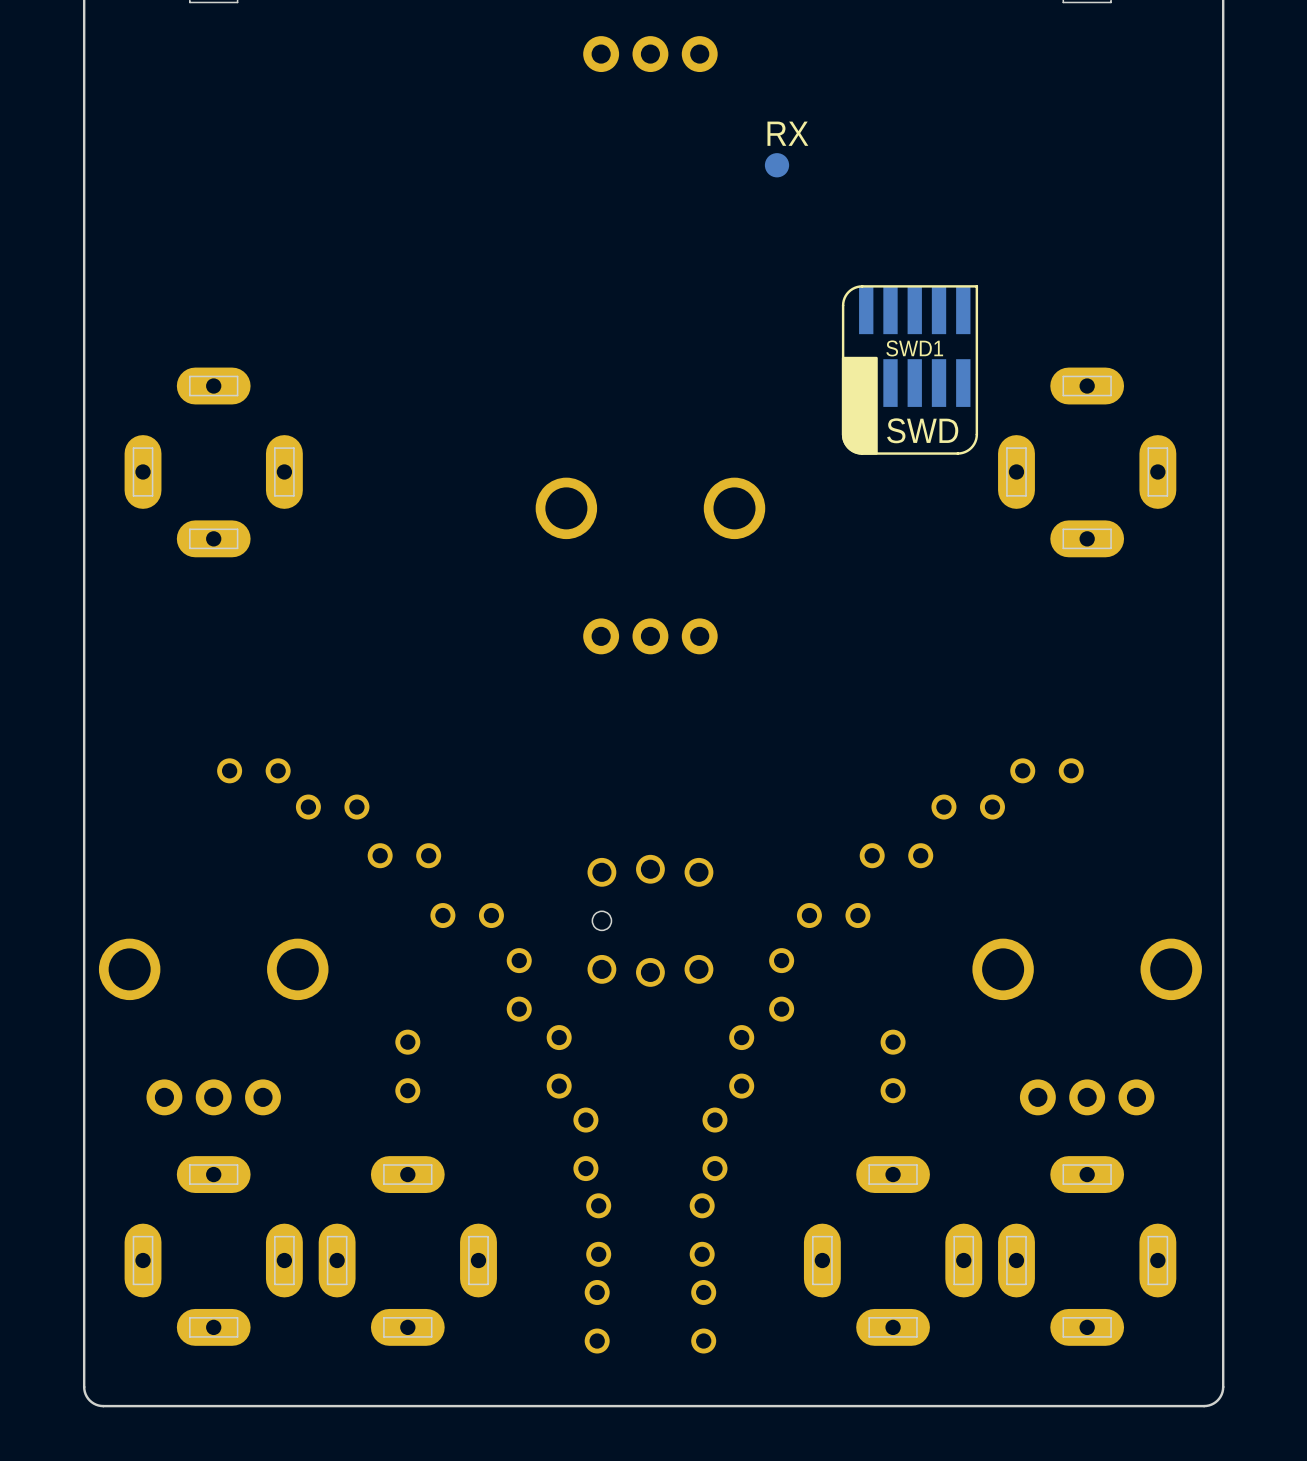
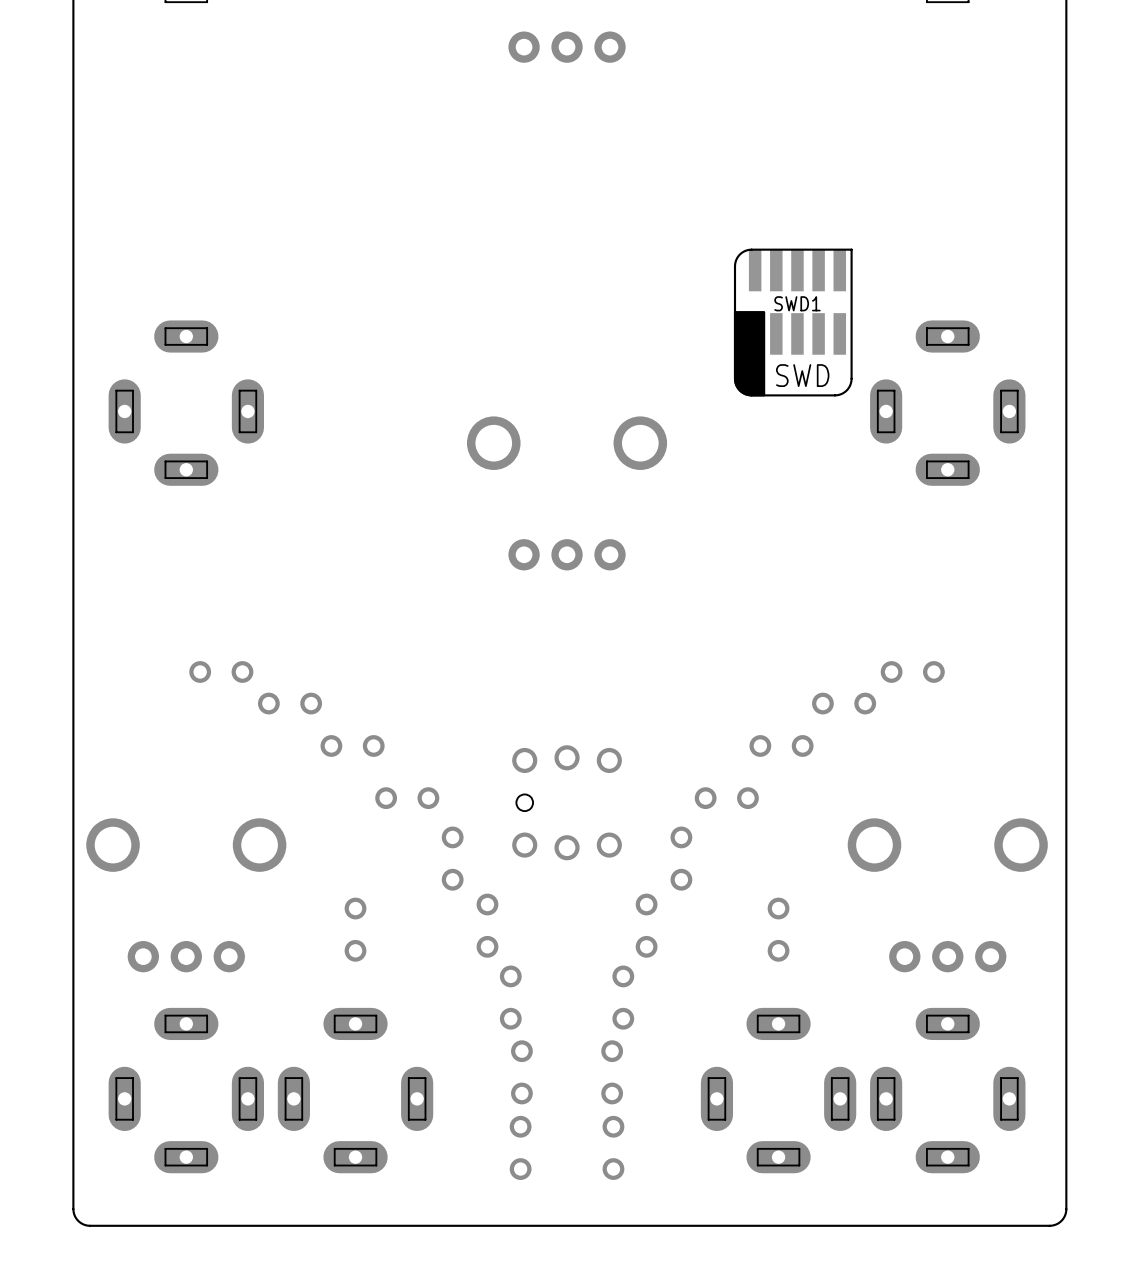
RX: (777, 165) -> none

